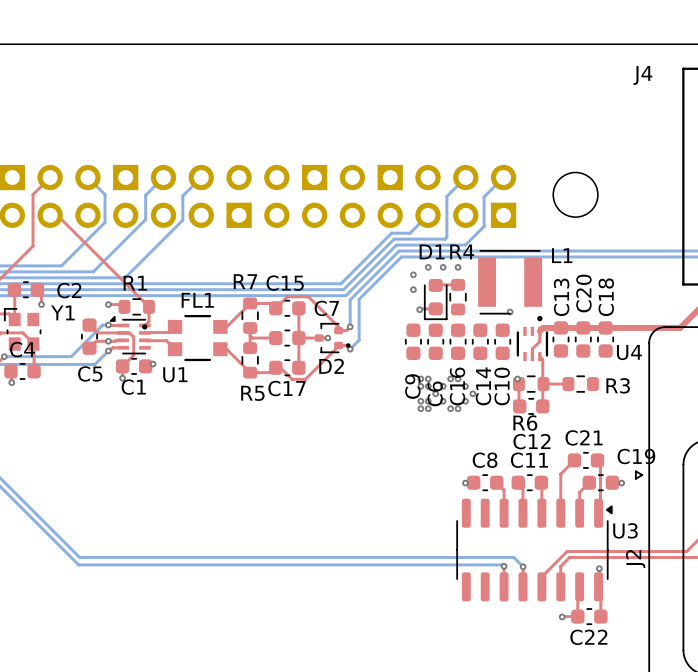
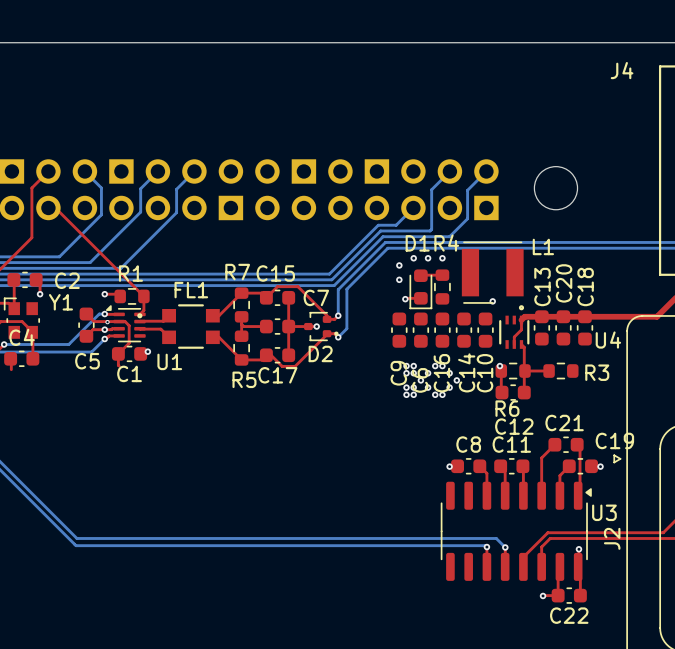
via: none -> (107, 322)
via: (122, 378) -> none
via: (11, 382) -> none

